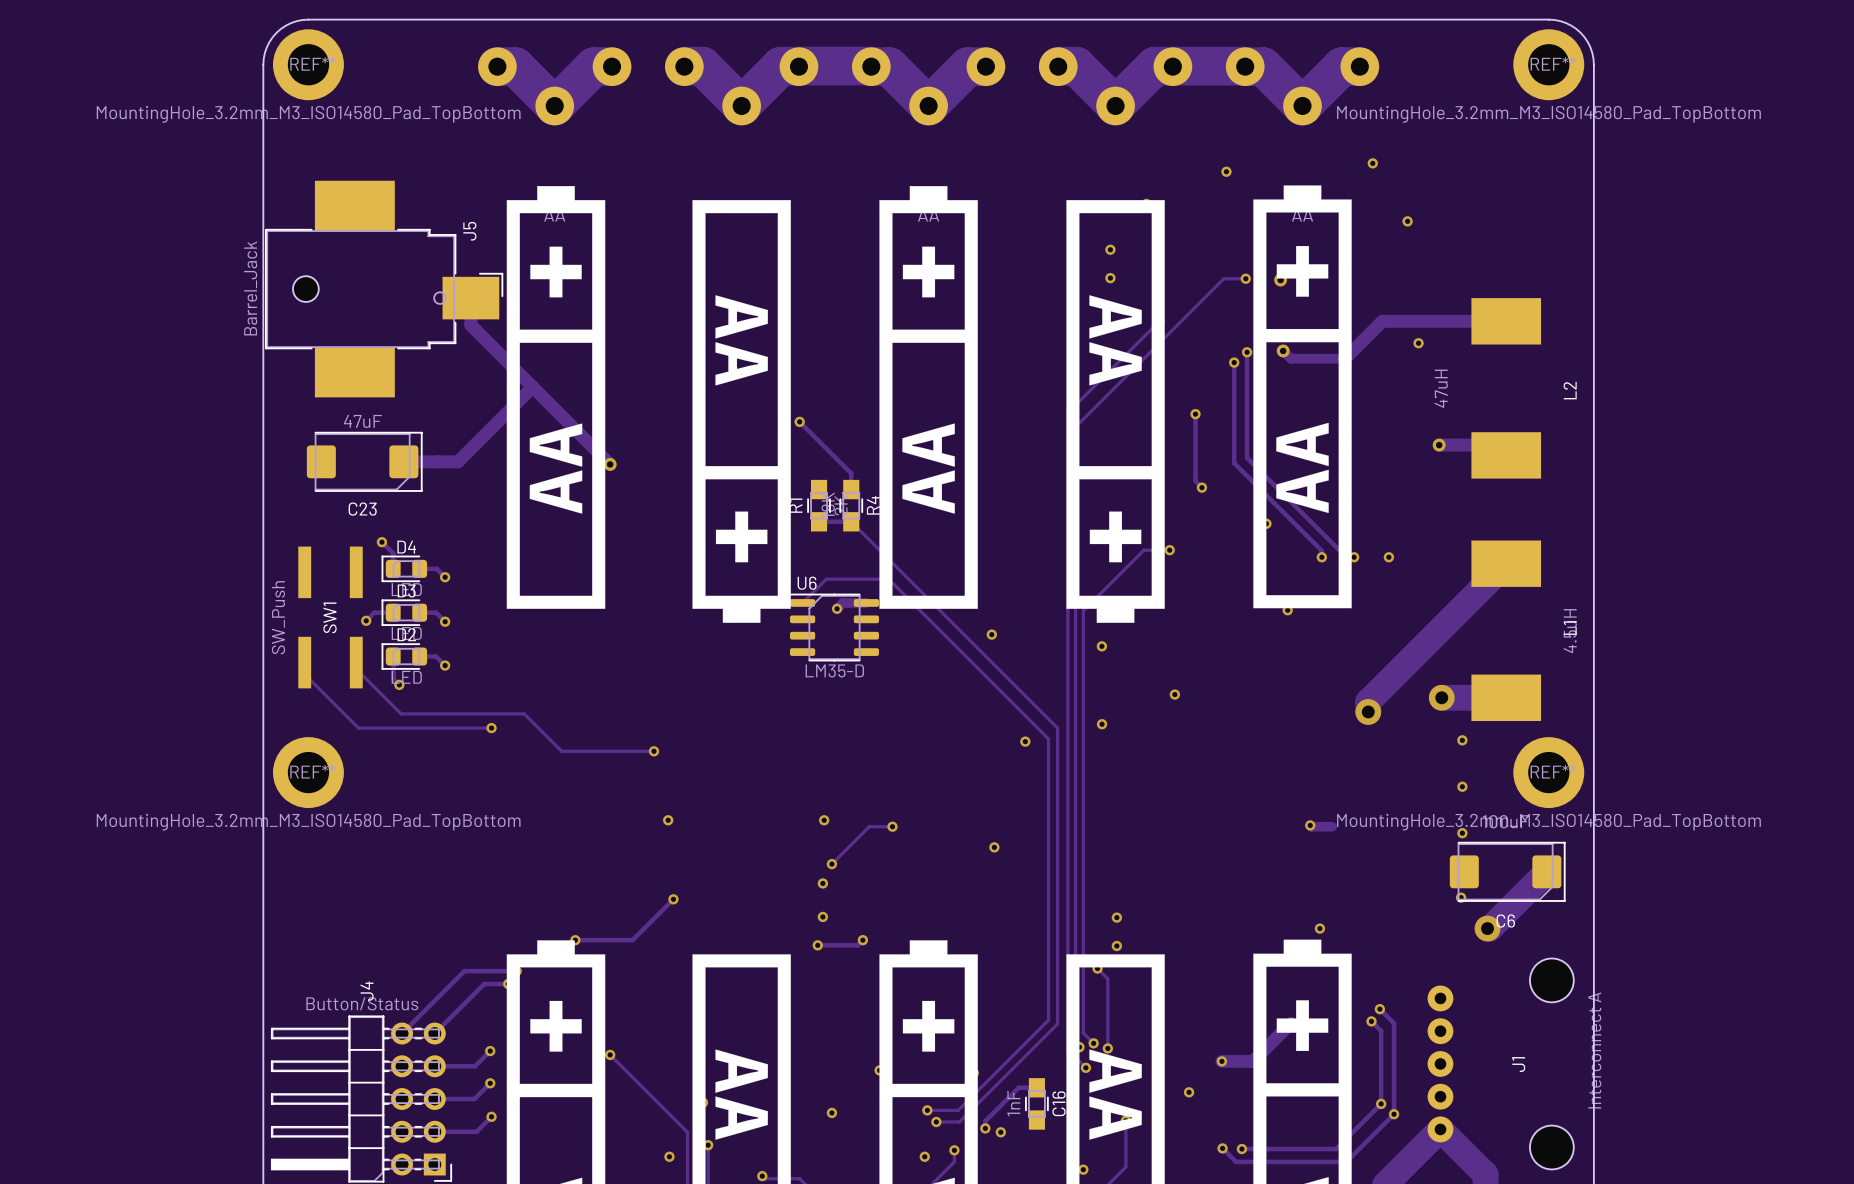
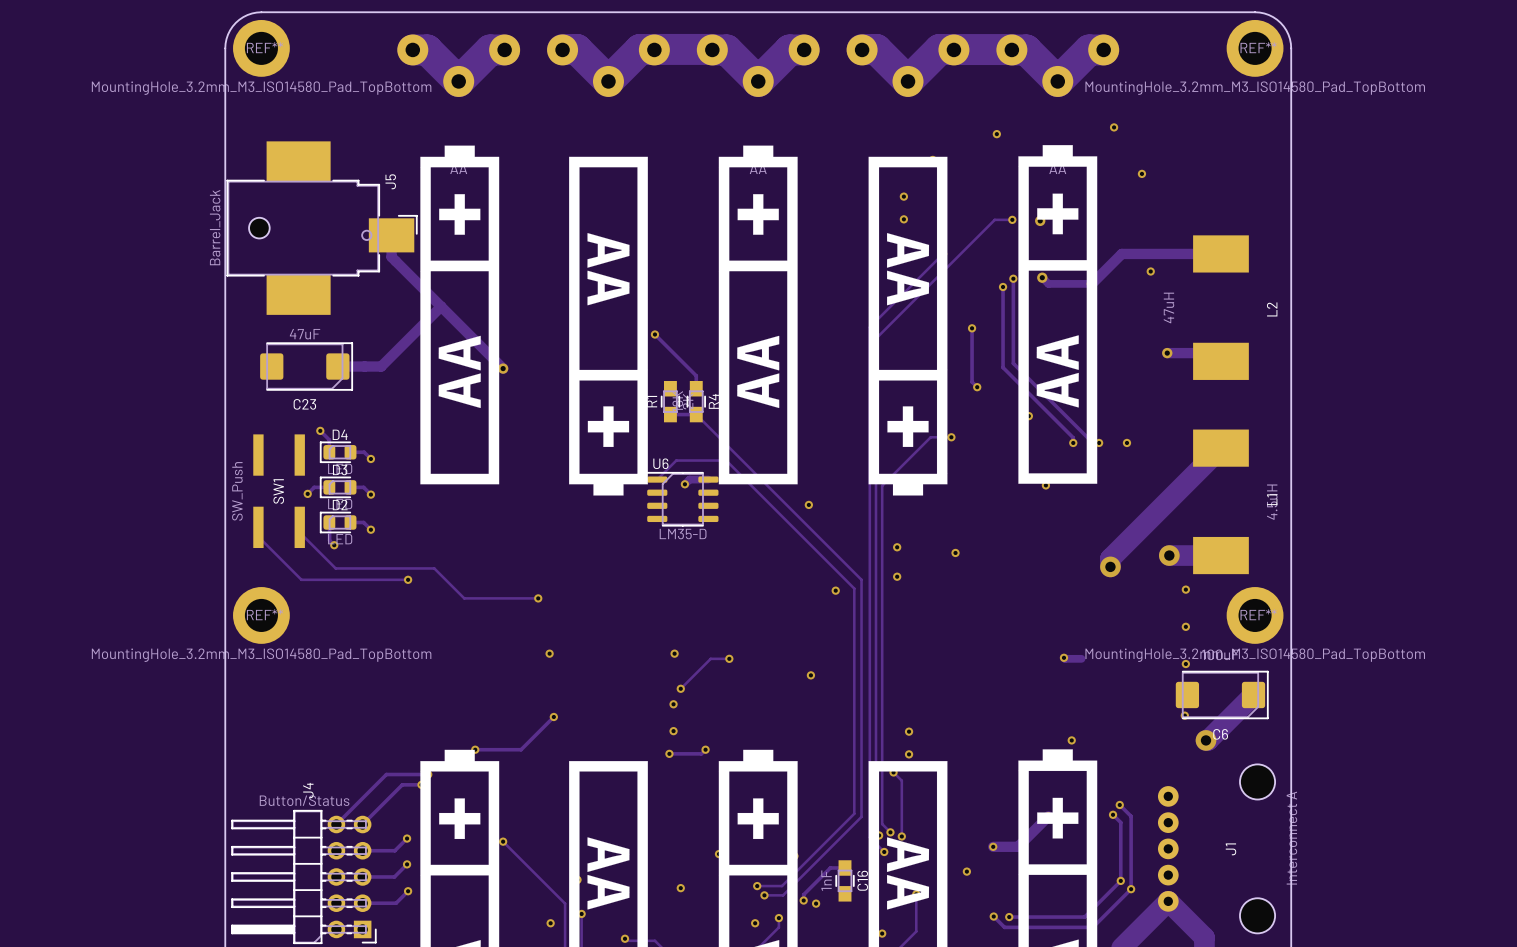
via position: (1101, 646) -> (897, 547)

